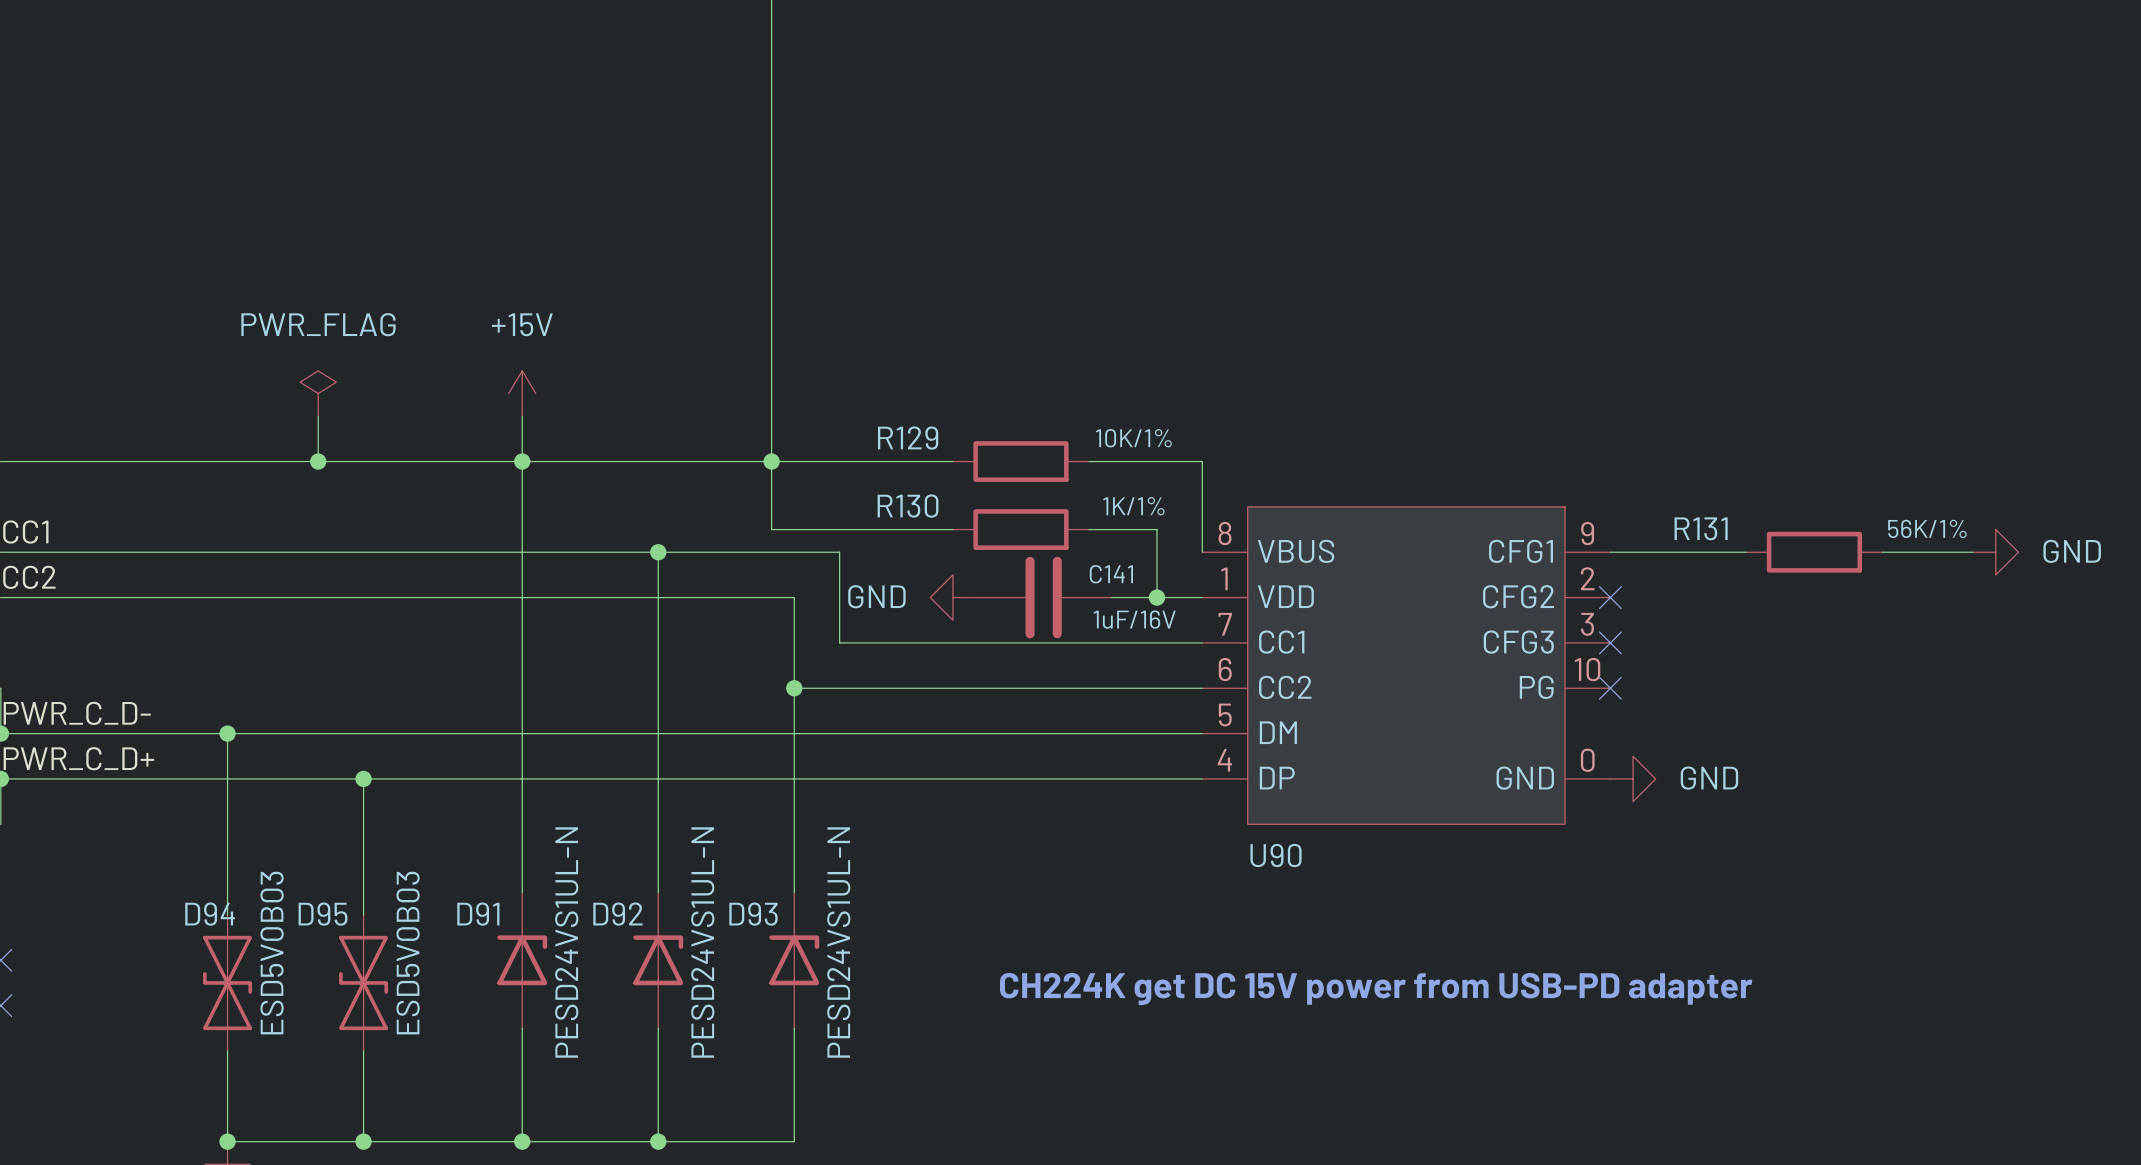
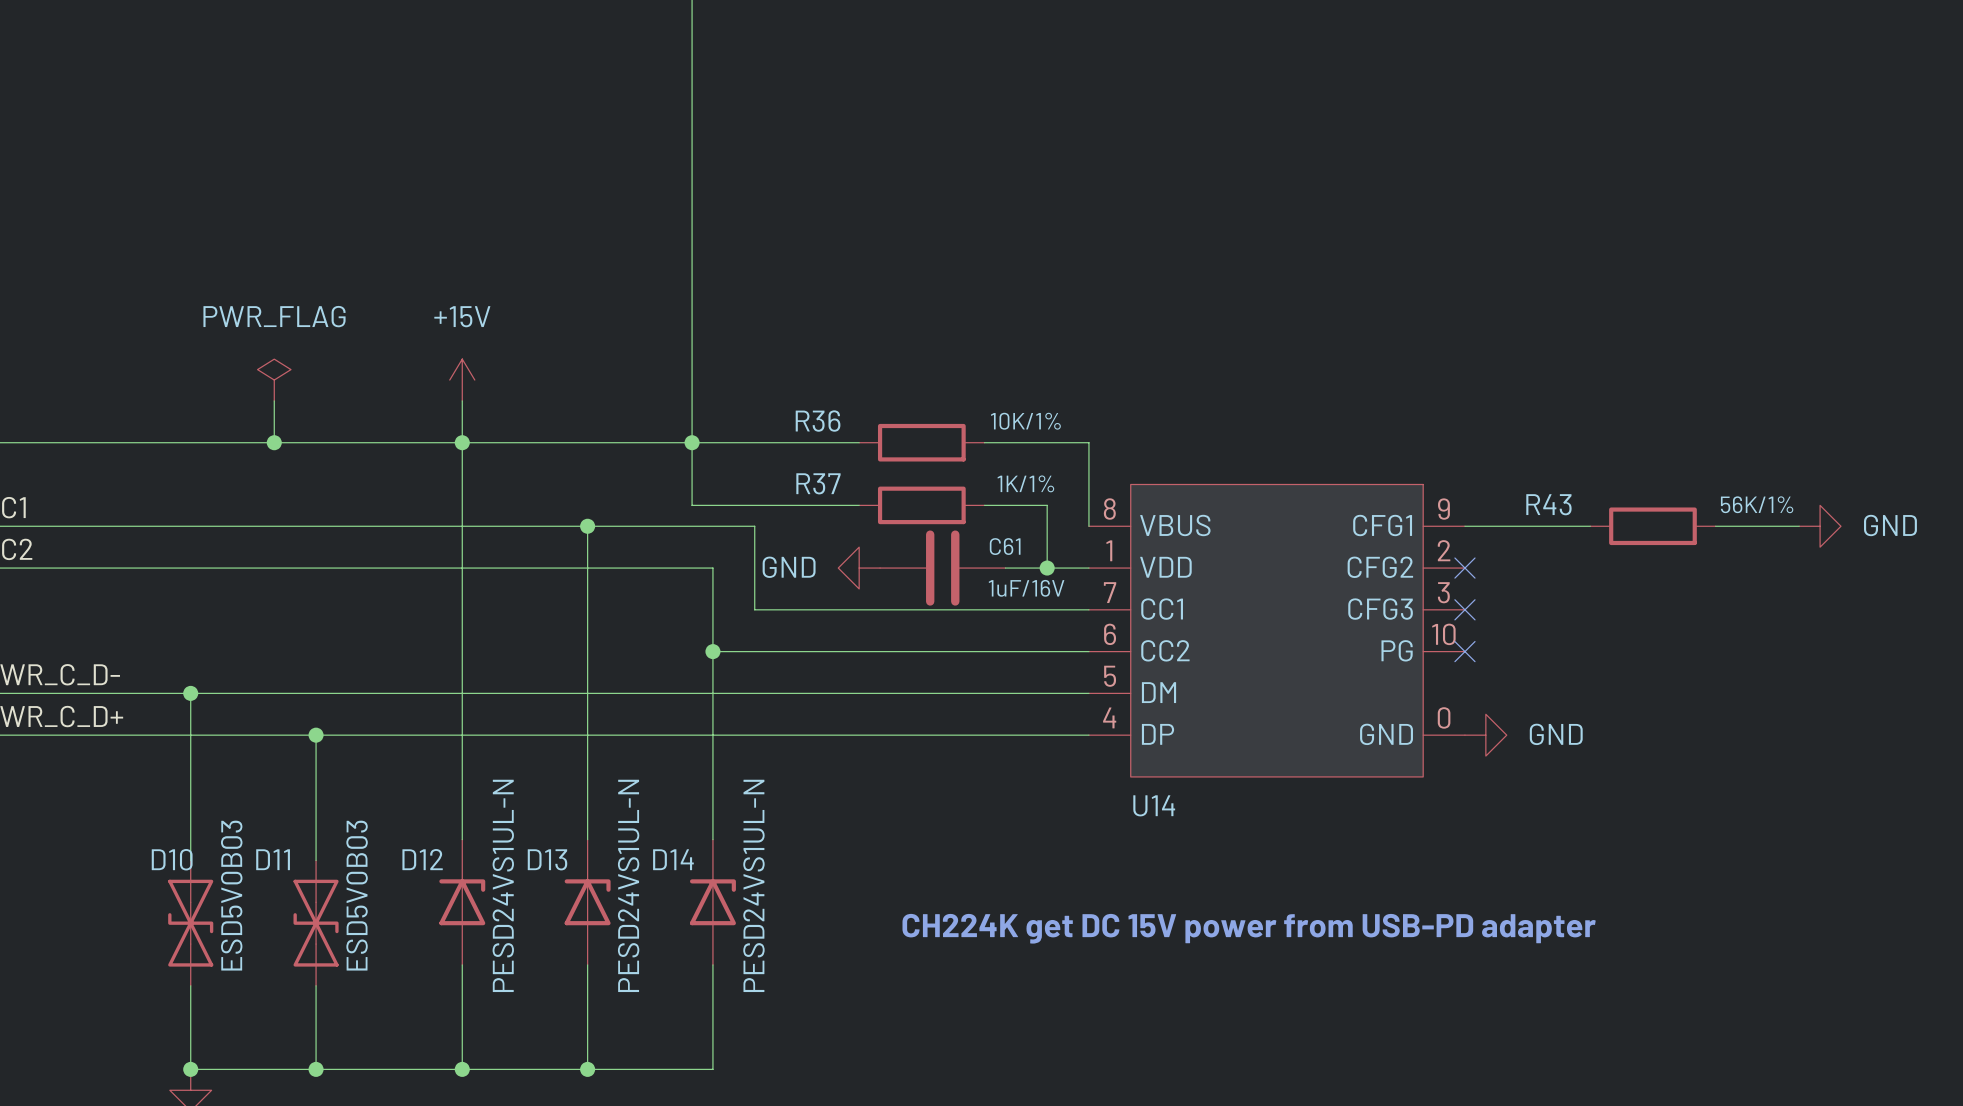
R129 name: R129 (908, 438) -> R36 (818, 421)
R130 name: R130 (908, 506) -> R37 (818, 483)
R131 name: R131 (1701, 528) -> R43 (1548, 504)
C141 name: C141 (1111, 574) -> C61 (1005, 546)
U90 name: U90 (1276, 855) -> U14 (1154, 805)
D94 name: D94 (210, 914) -> D10 (172, 859)
D95 name: D95 (323, 914) -> D11 (273, 859)
D91 name: D91 (478, 914) -> D12 (422, 859)
D92 name: D92 (617, 914) -> D13 (547, 859)
D93 name: D93 (753, 914) -> D14 (673, 859)

